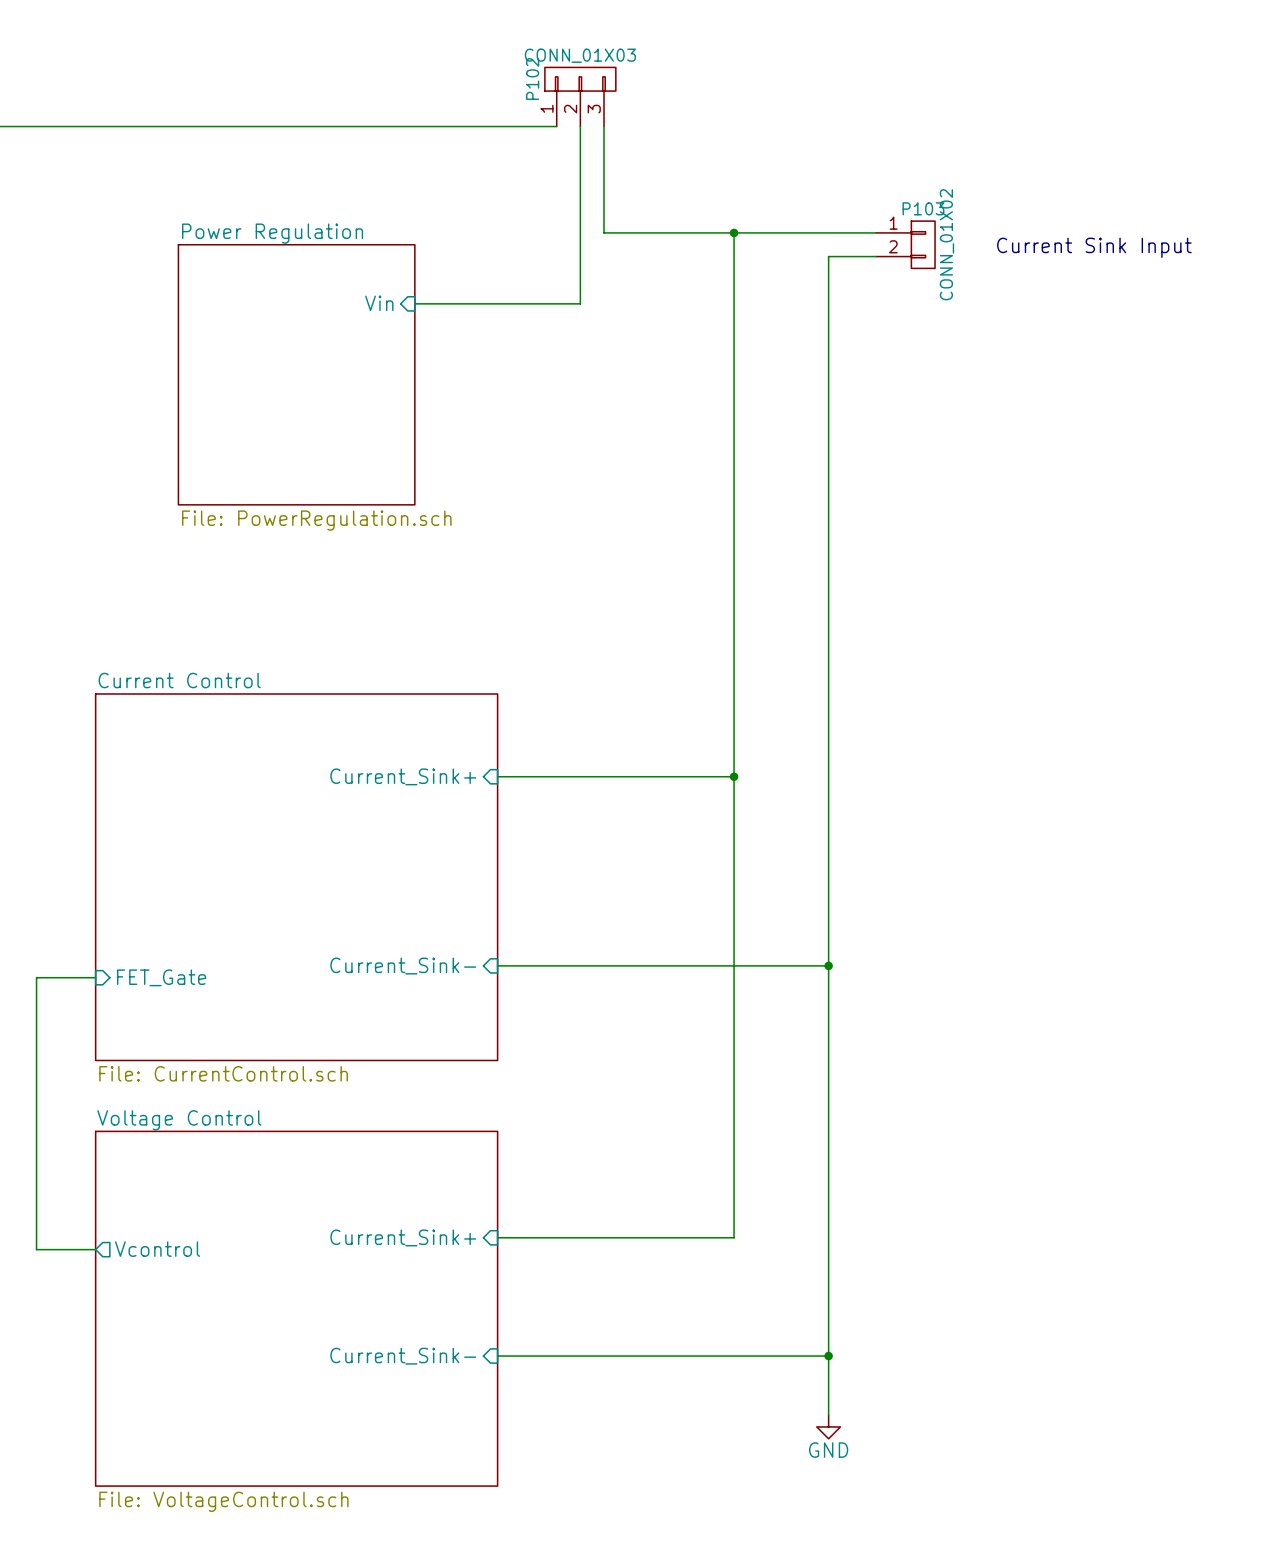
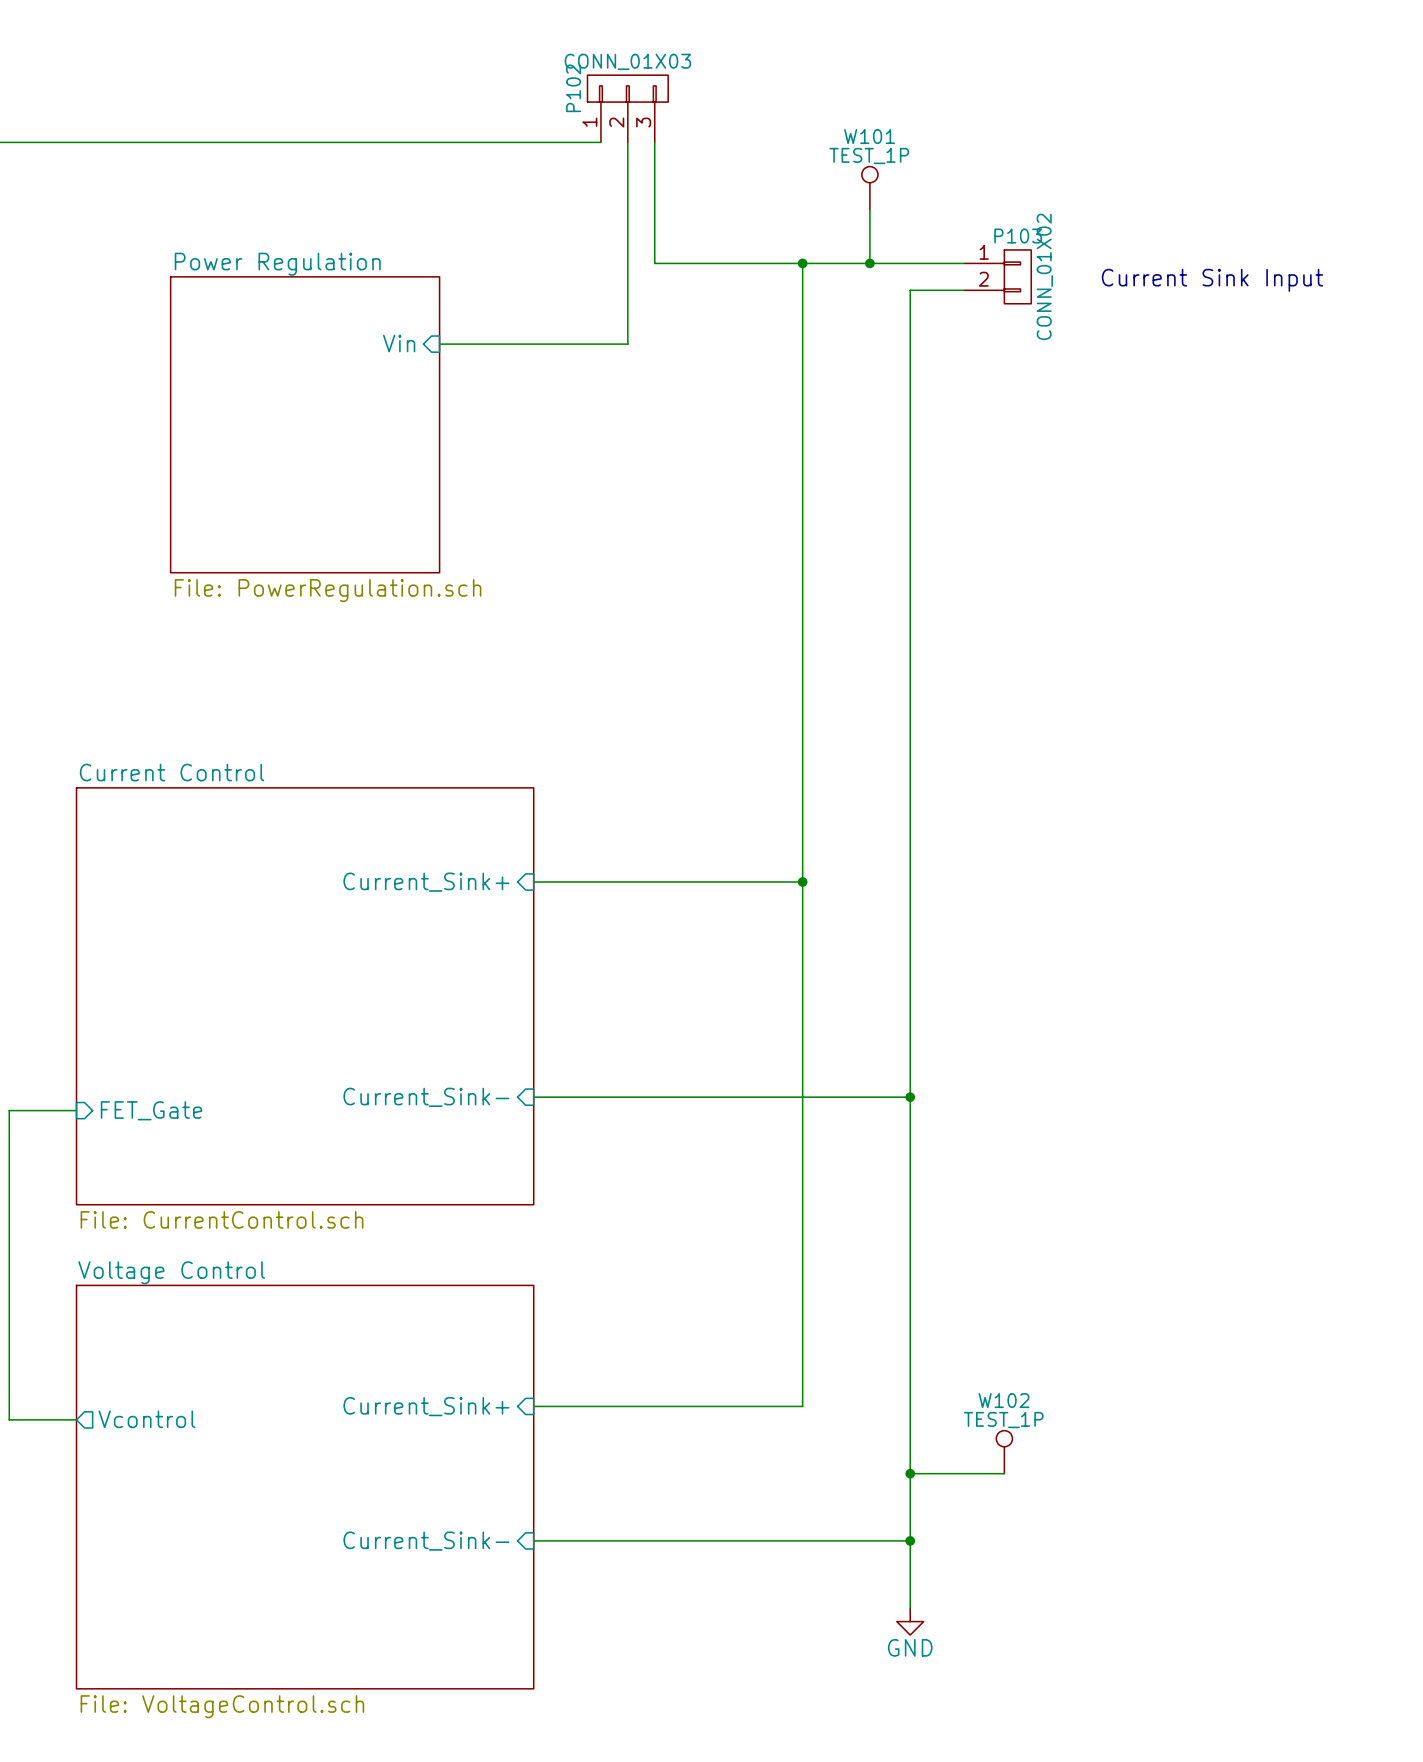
W101: none -> TEST_1P (869, 188)
wire: none -> (869, 209) (869, 263)
junction: none -> (869, 263)
W102: none -> TEST_1P (1004, 1452)
wire: none -> (910, 1473) (1004, 1473)
junction: none -> (910, 1473)

